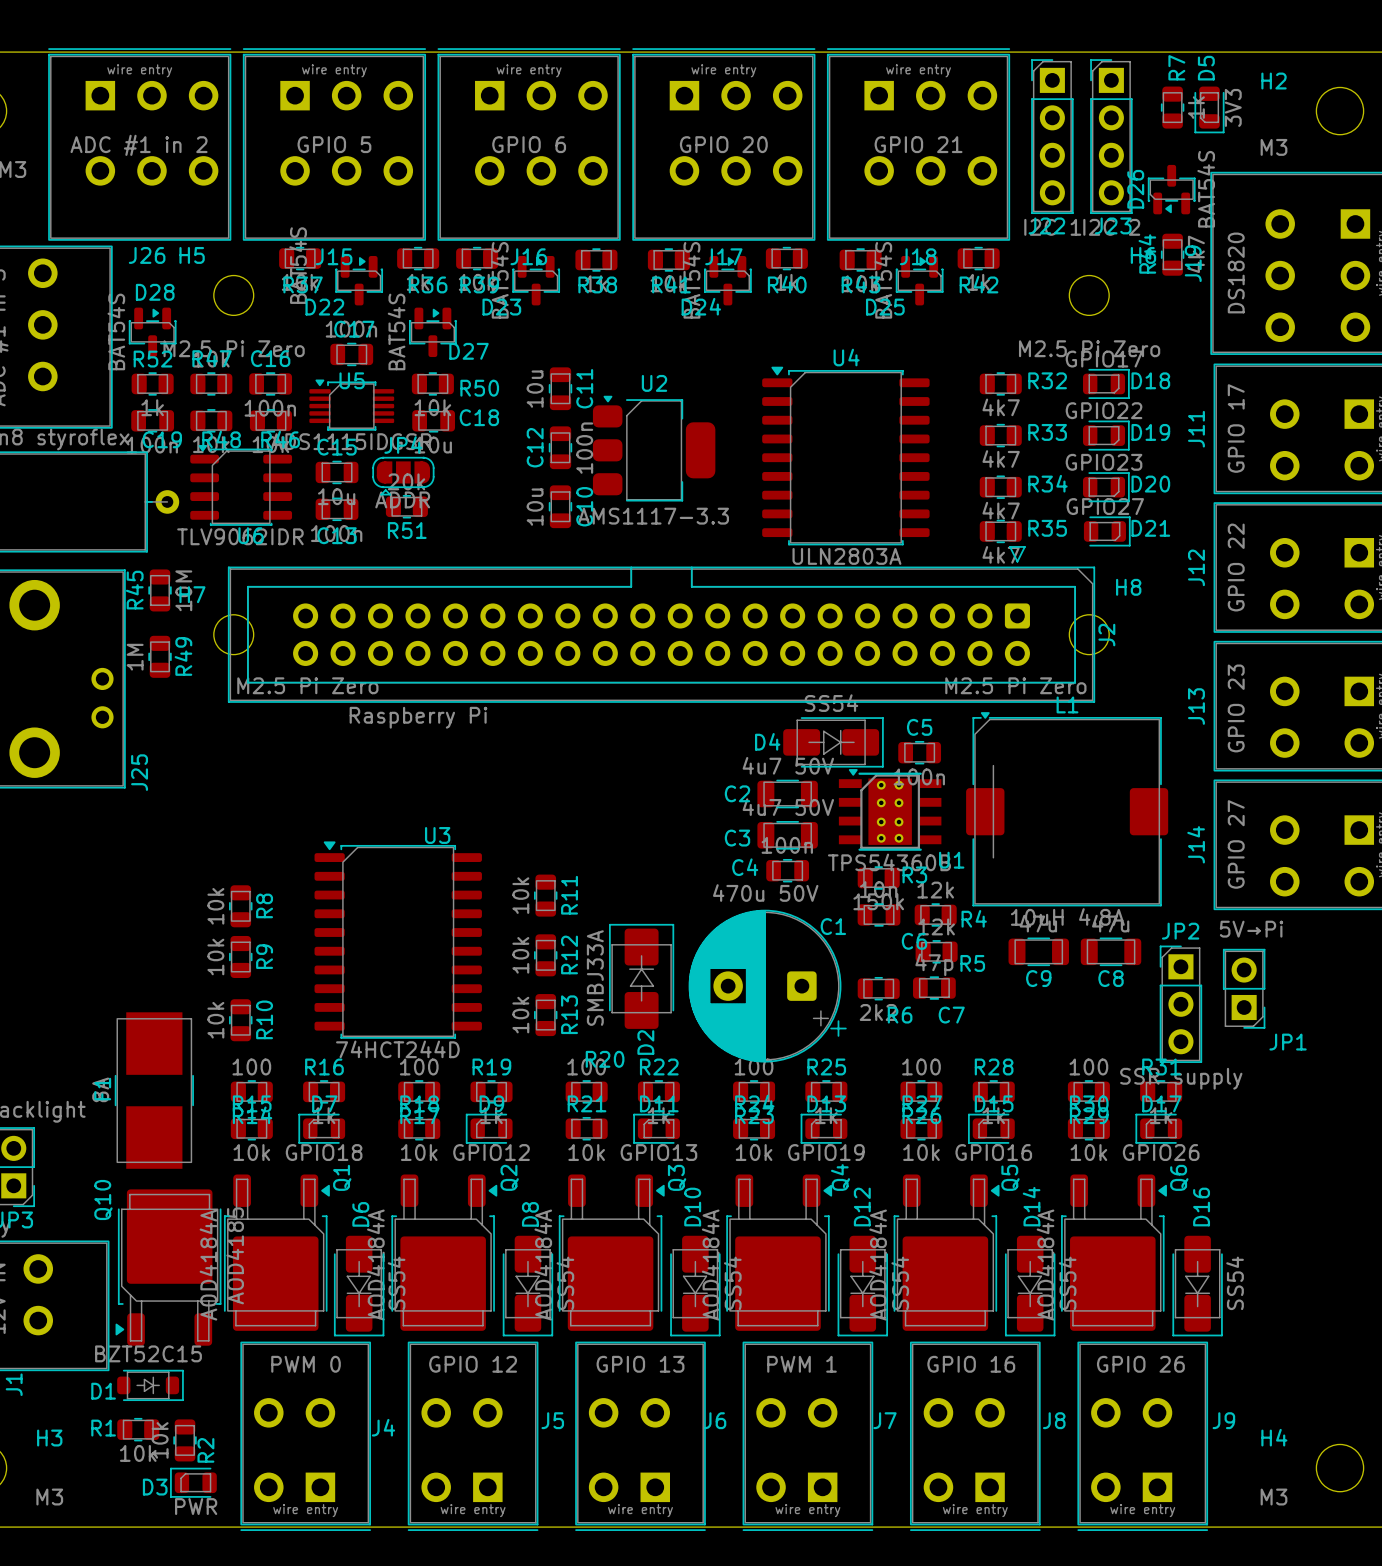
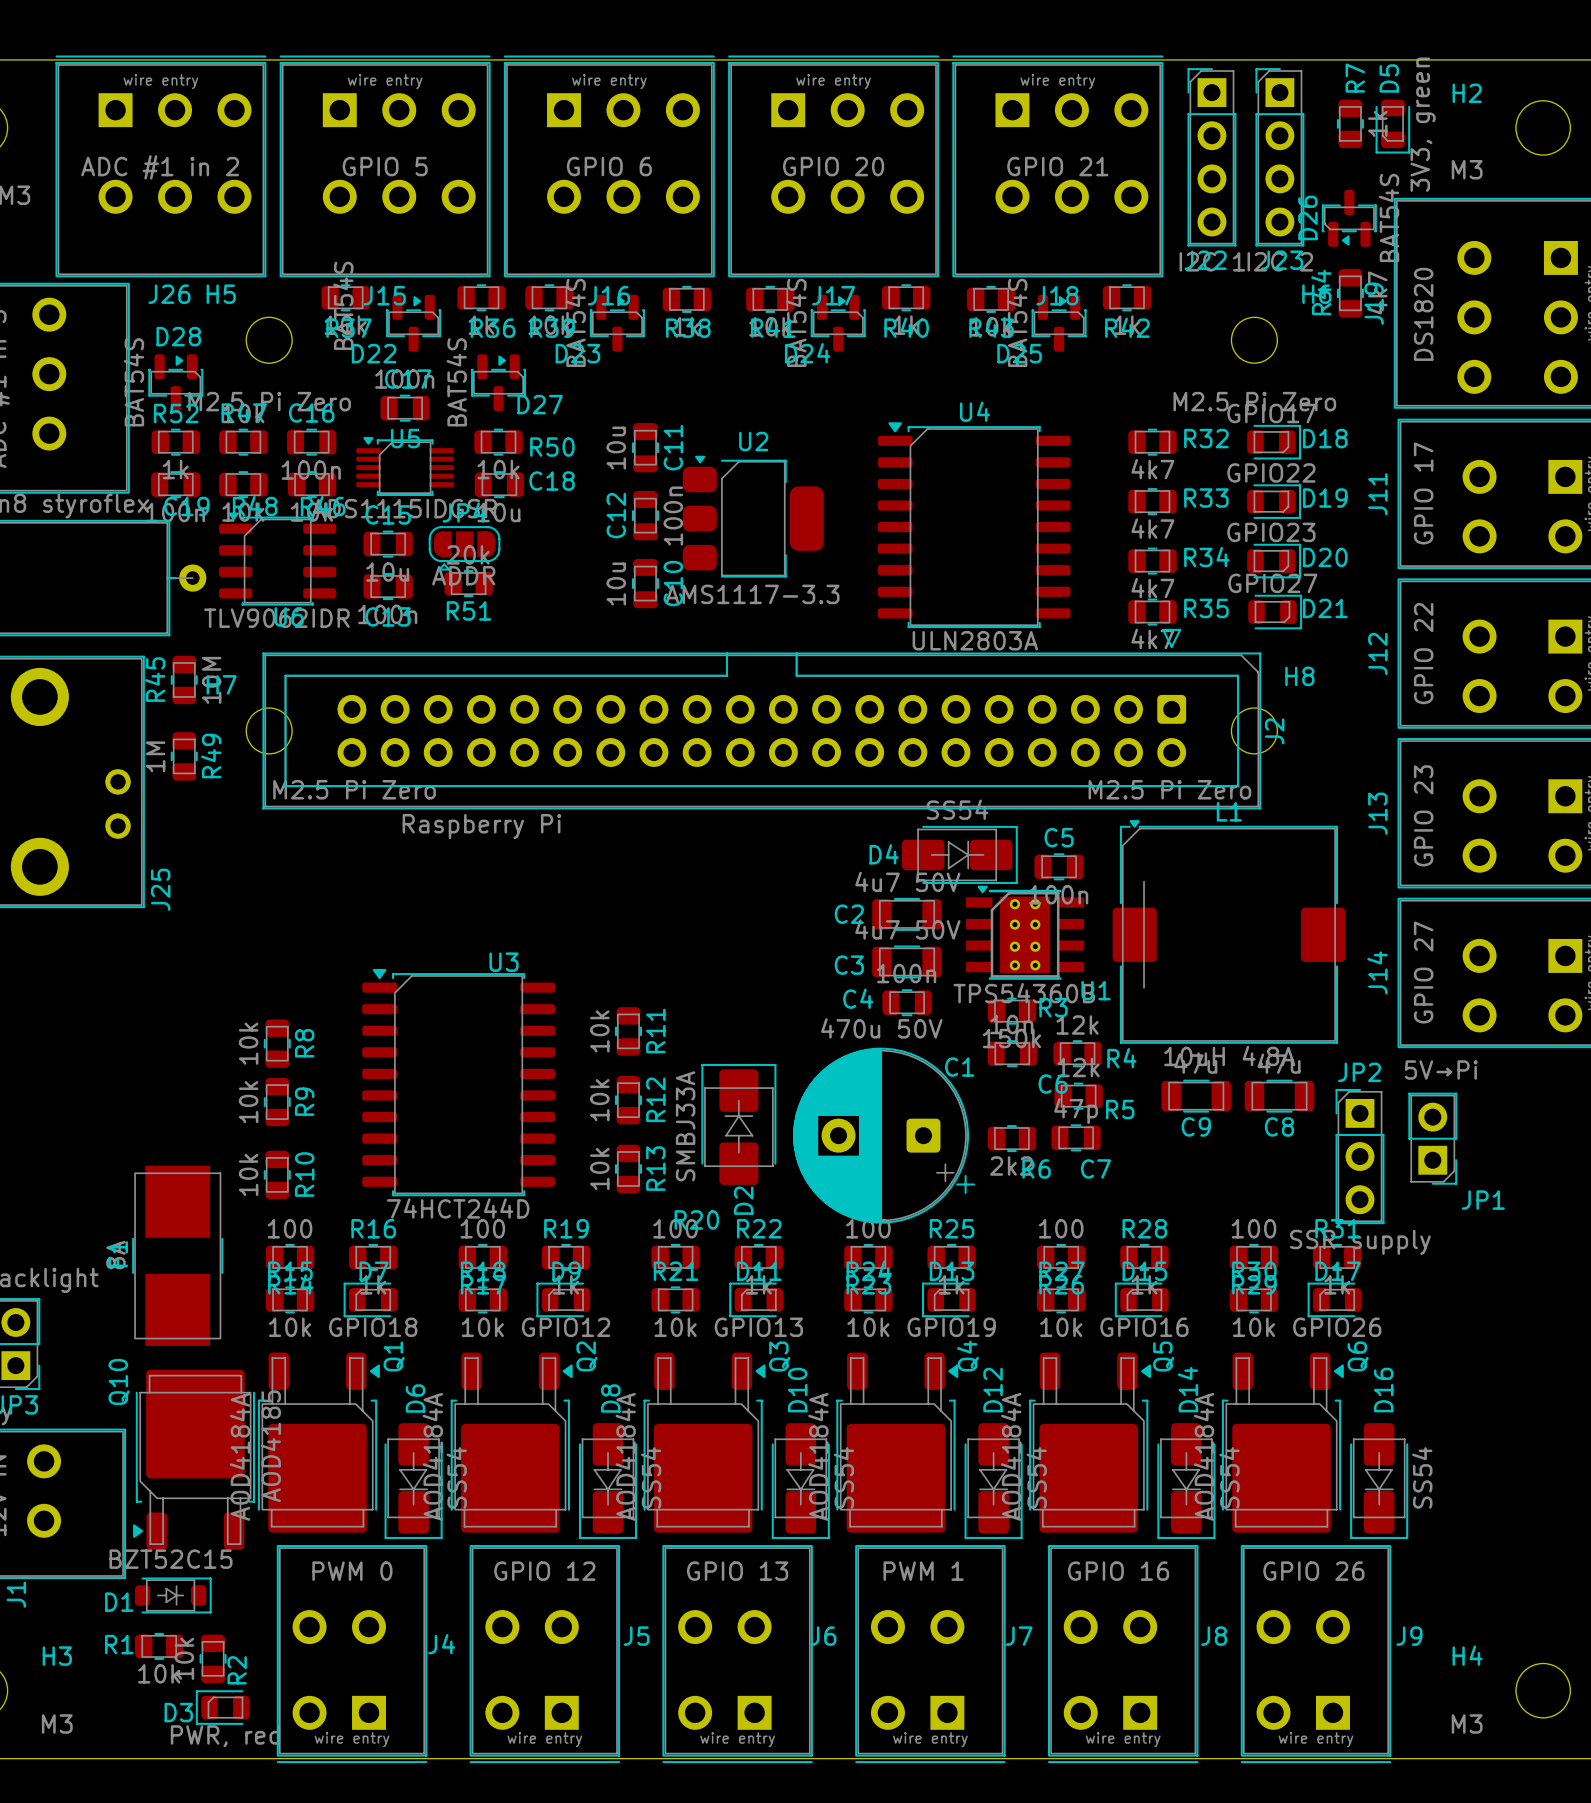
D5 value: 3V3 (1233, 107) -> 3V3, green (1423, 124)
D3 value: PWR (196, 1506) -> PWR, red (225, 1736)

